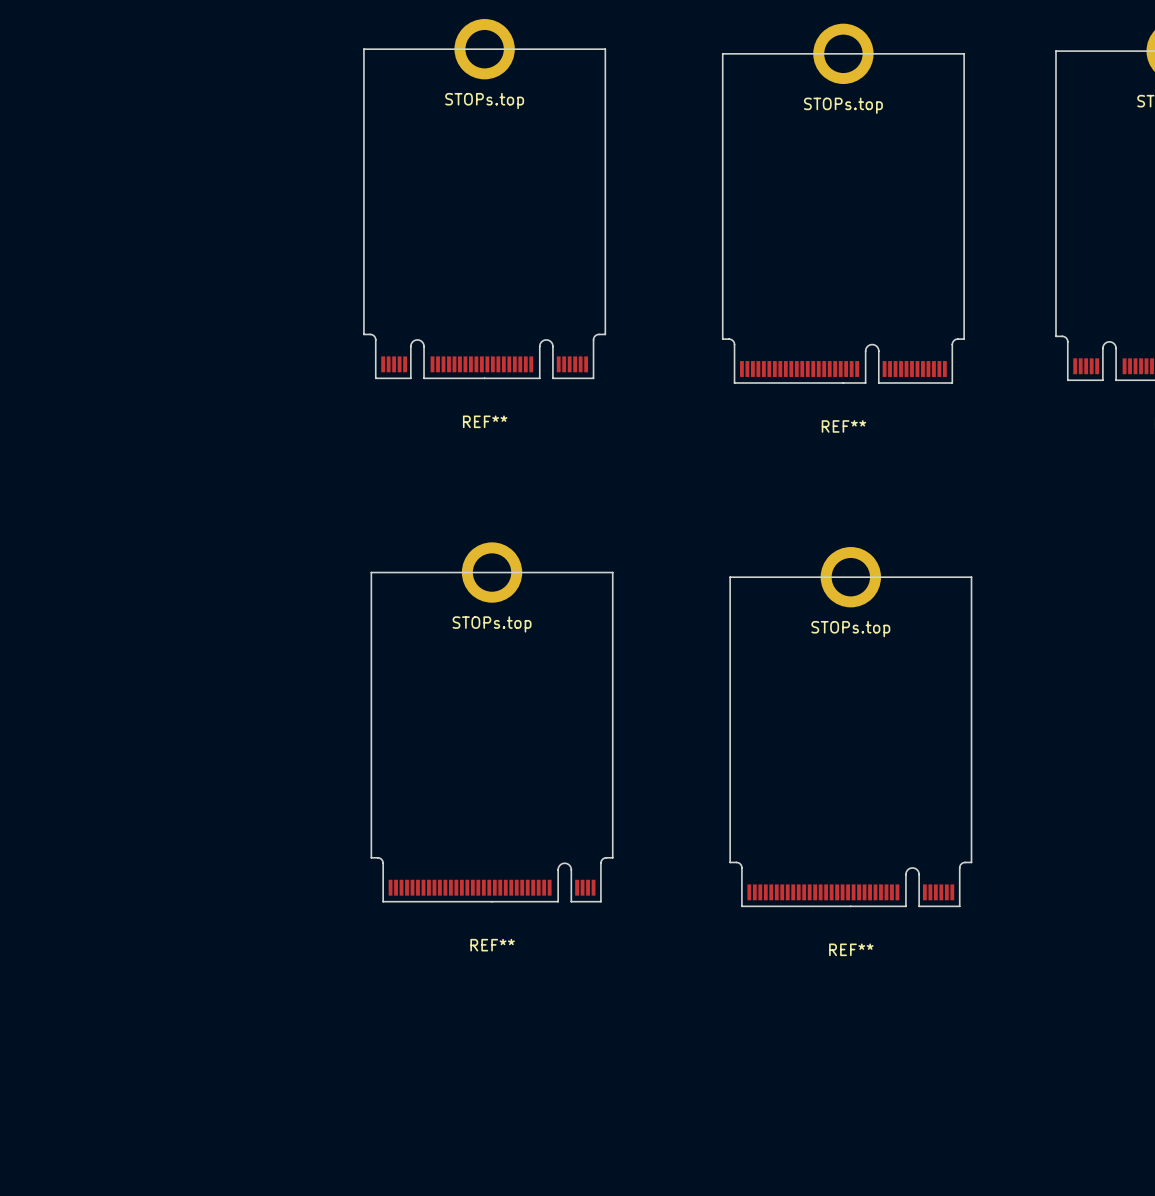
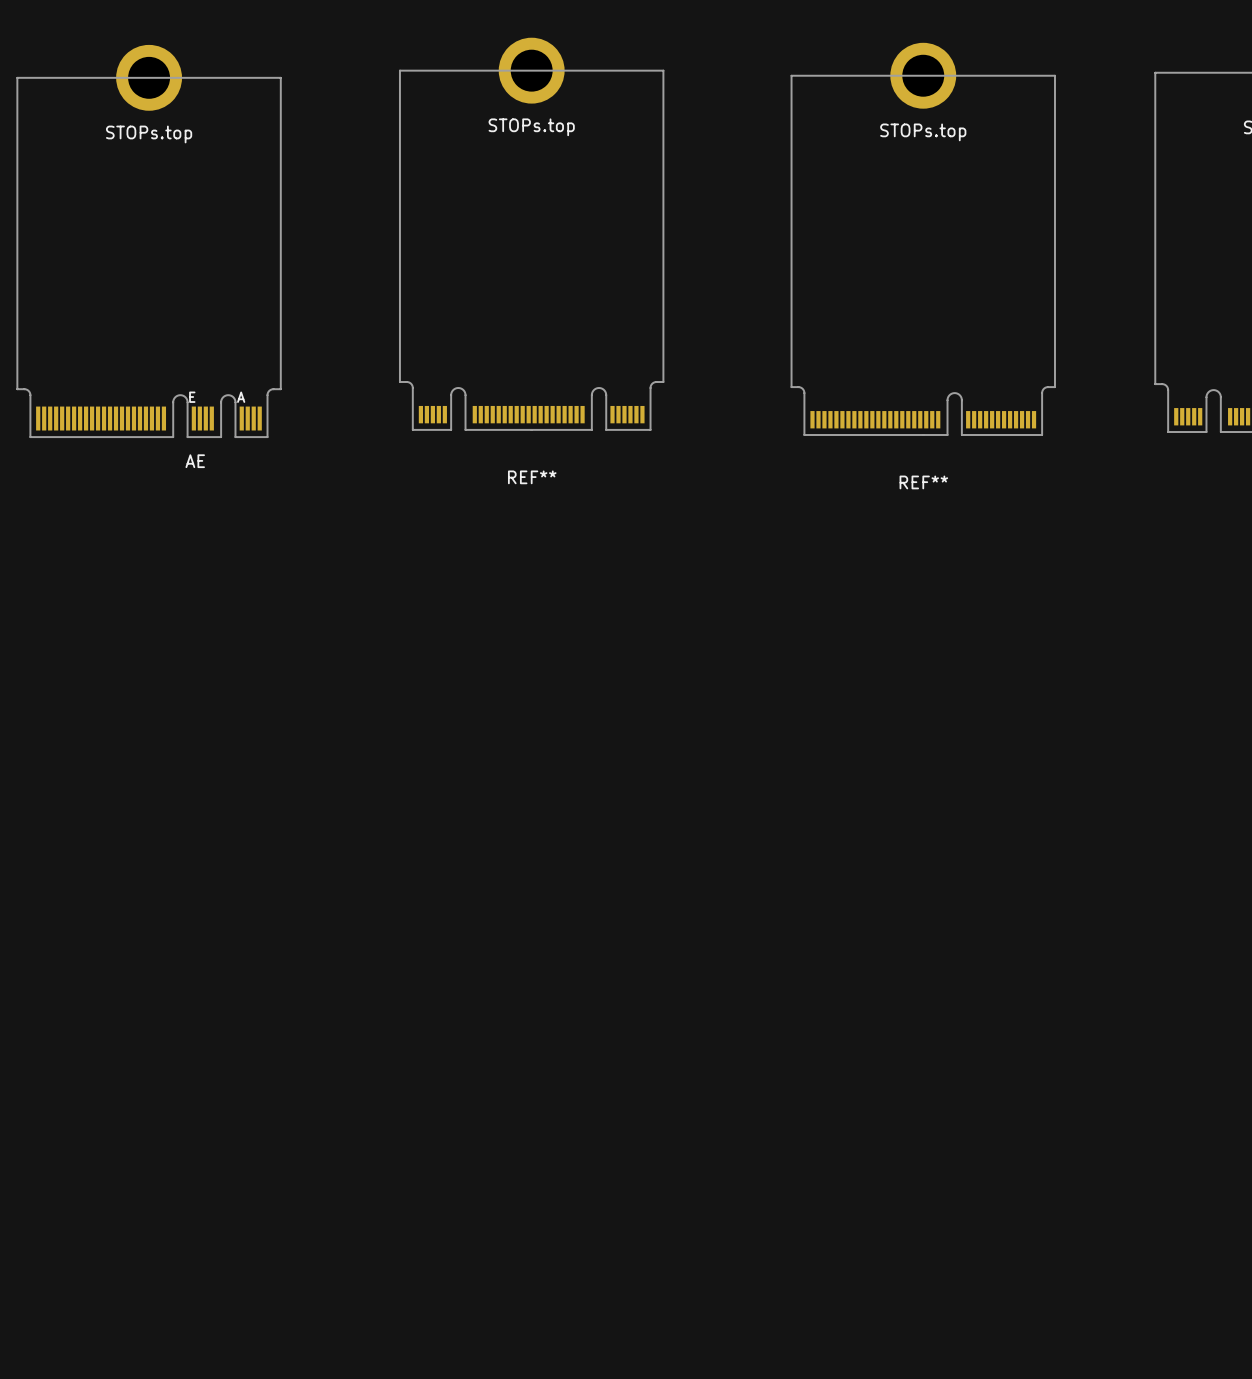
STOPs.top: none -> (149, 77)
board edge: none -> (17, 389) (17, 77) (280, 77) (280, 389)
AE: none -> (148, 413)
STOPs.top: (492, 572) -> none
STOPs.top: (850, 577) -> none
board edge: (371, 857) (371, 572) (612, 572) (612, 857) -> none
board edge: (730, 862) (730, 577) (971, 577) (971, 862) -> none
REF**: (492, 879) -> none
REF**: (850, 884) -> none

